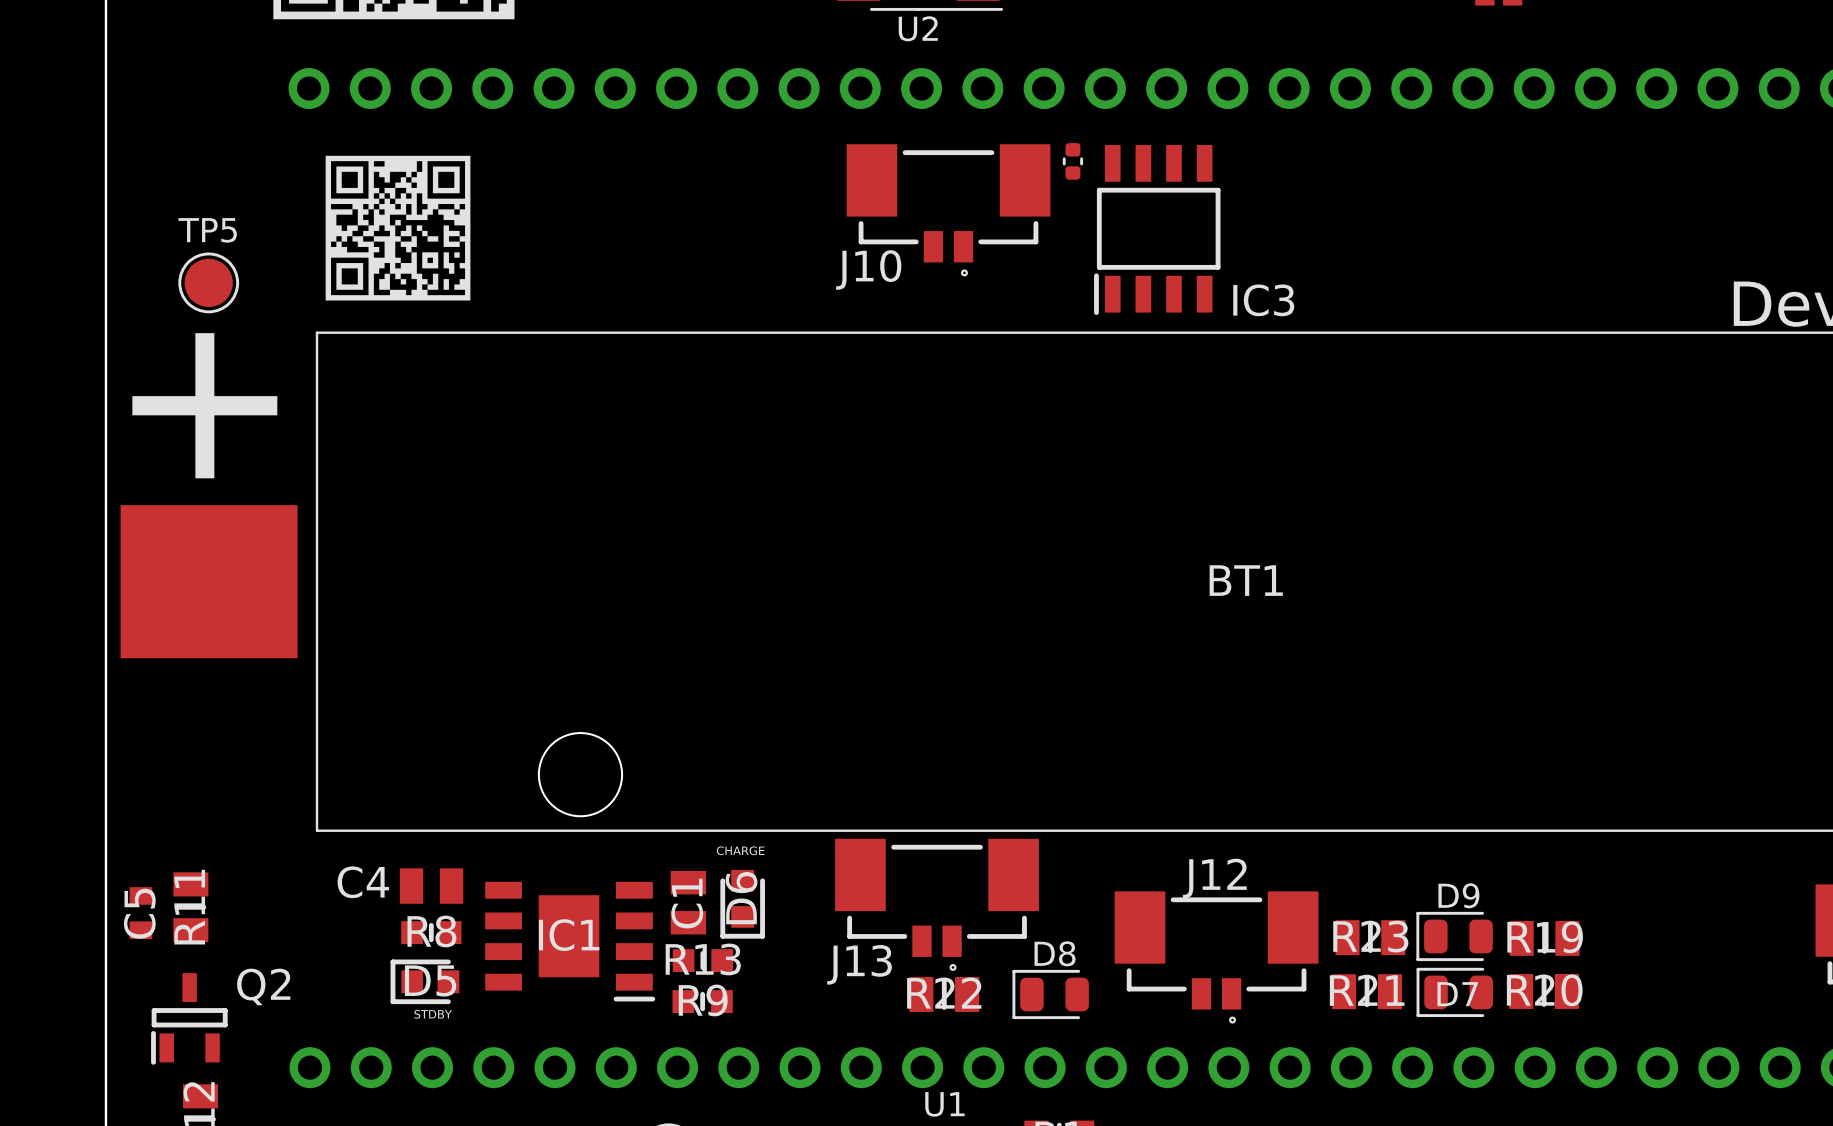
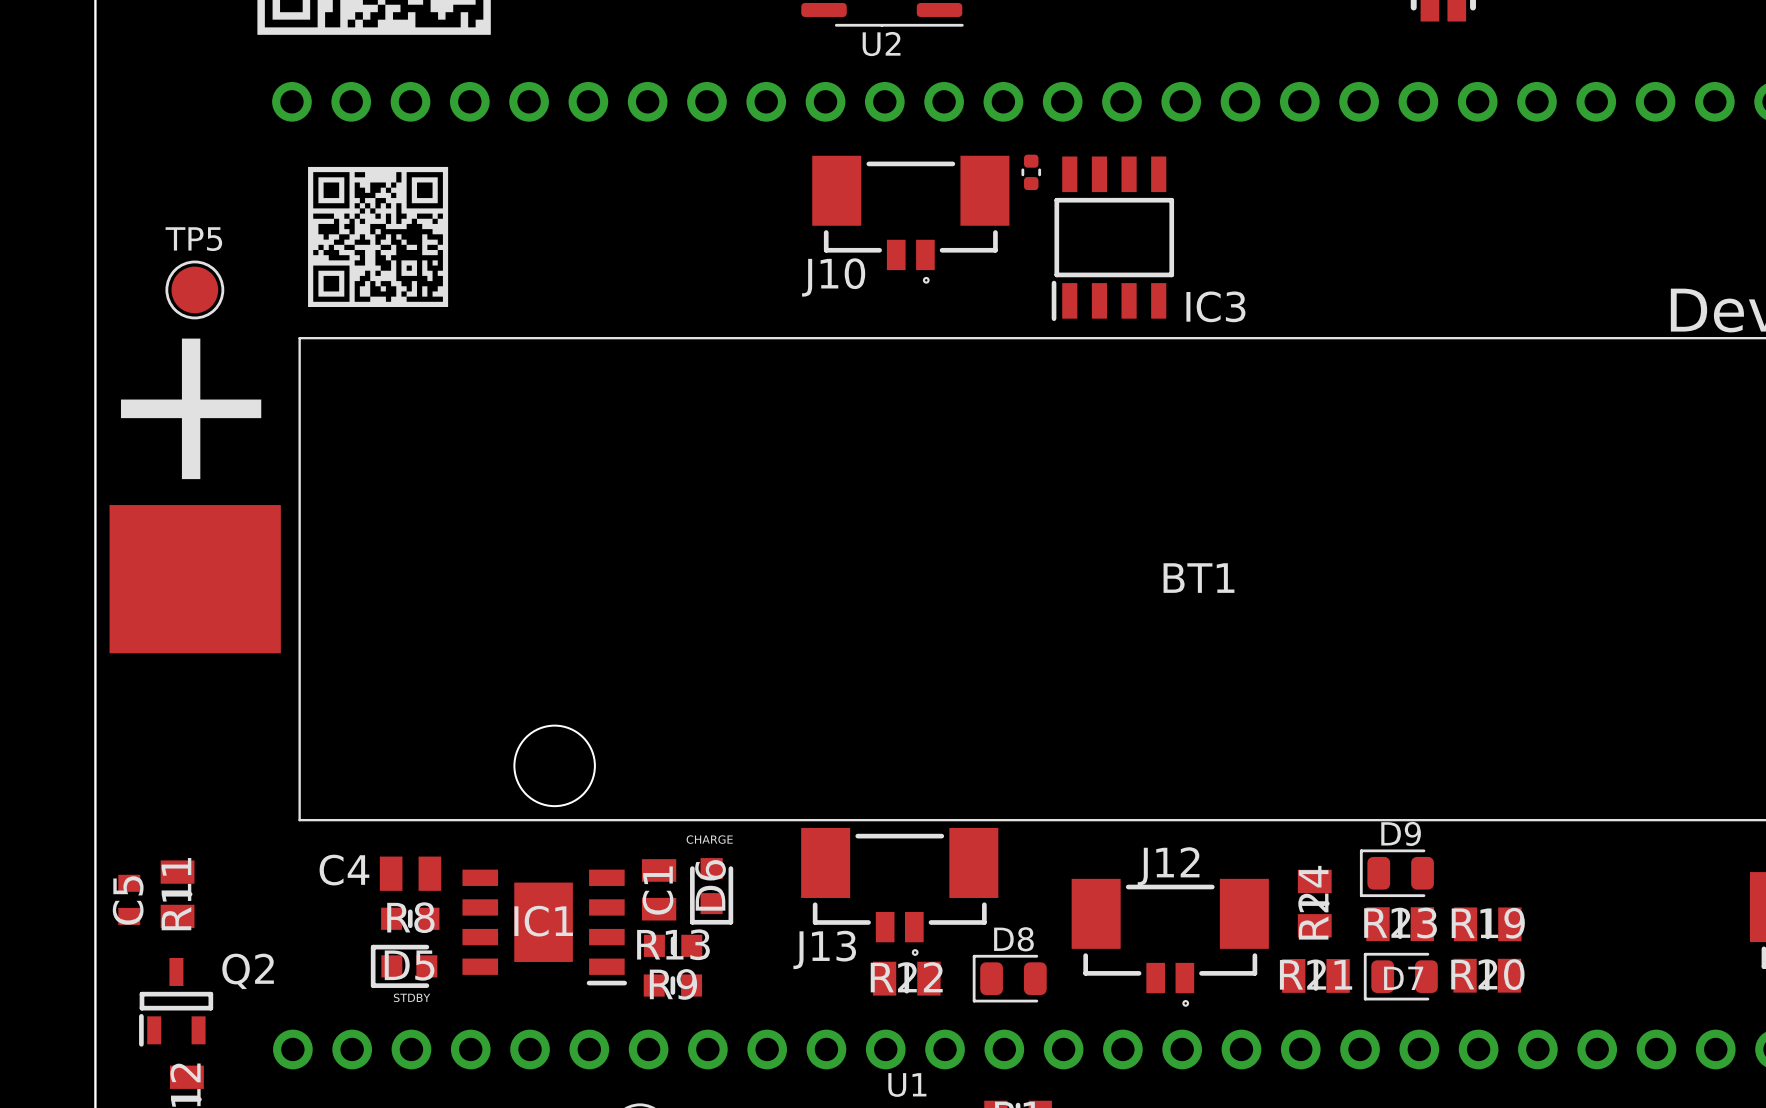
R24: none -> (1314, 903)
D9 position: (1454, 936) -> (1396, 873)
R23 position: (1370, 937) -> (1400, 924)

